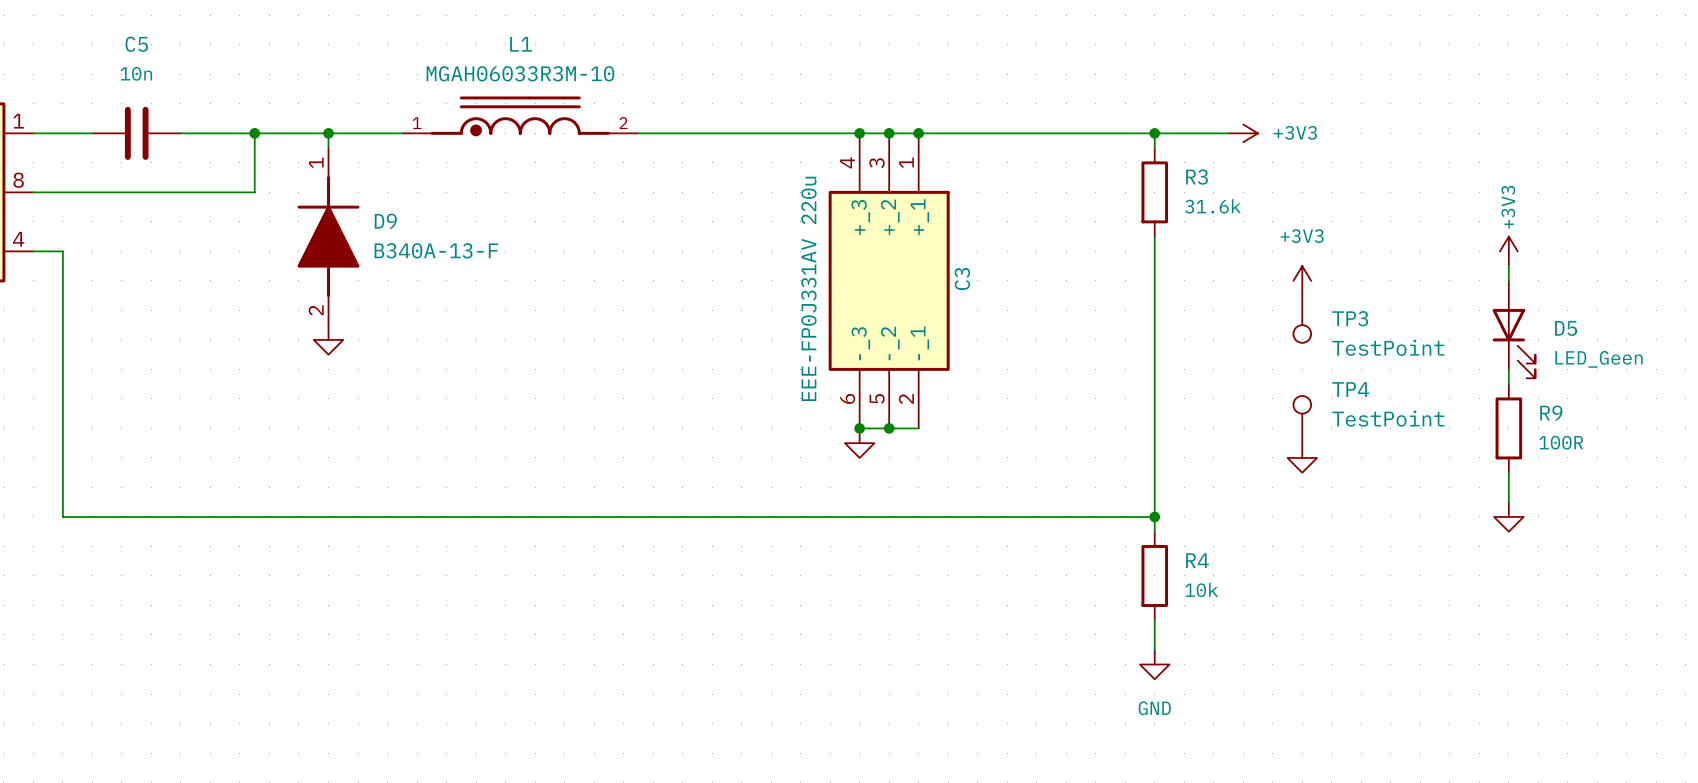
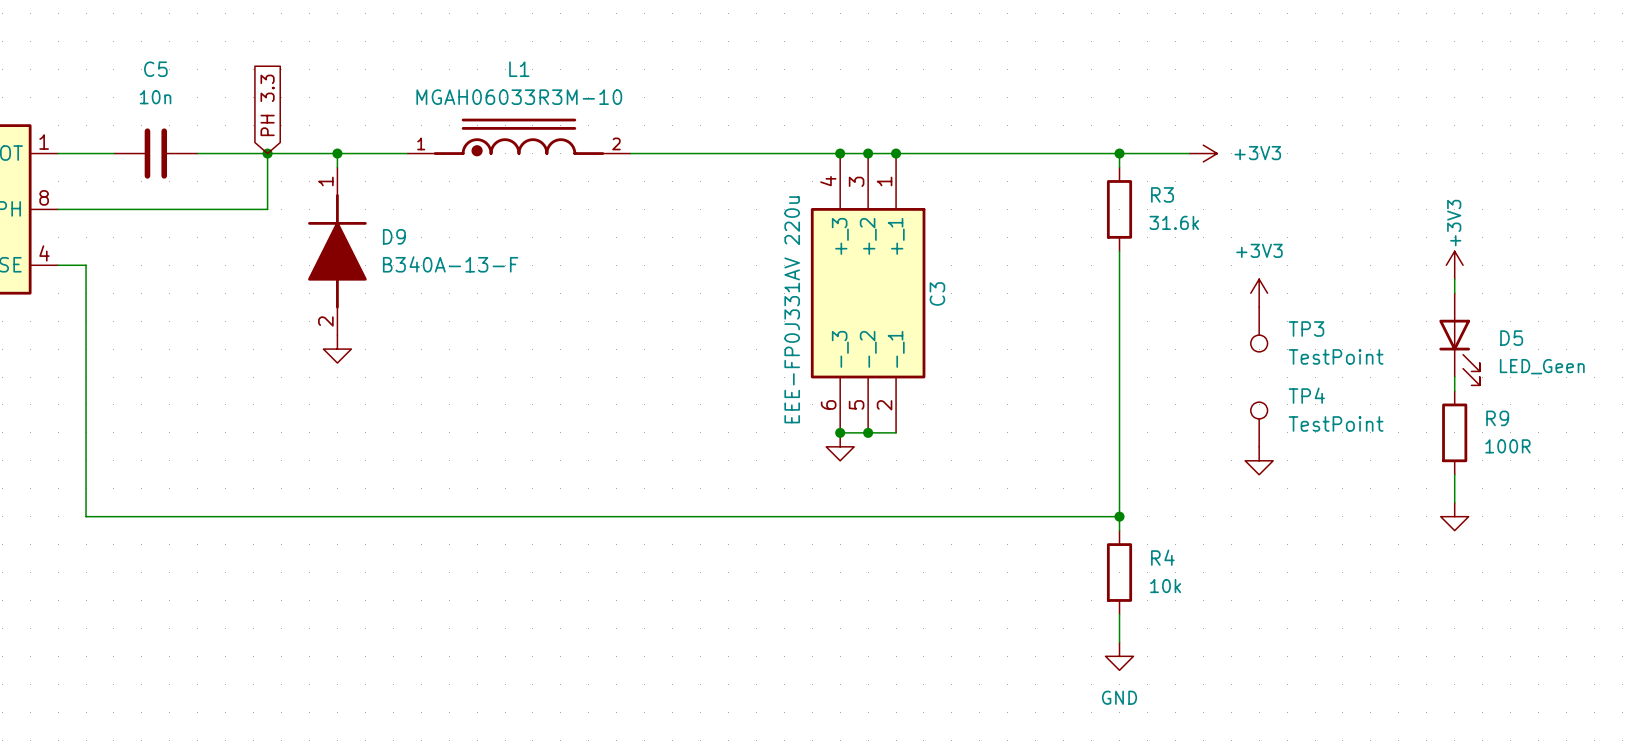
global label: none -> PH 3.3 (267, 105)

